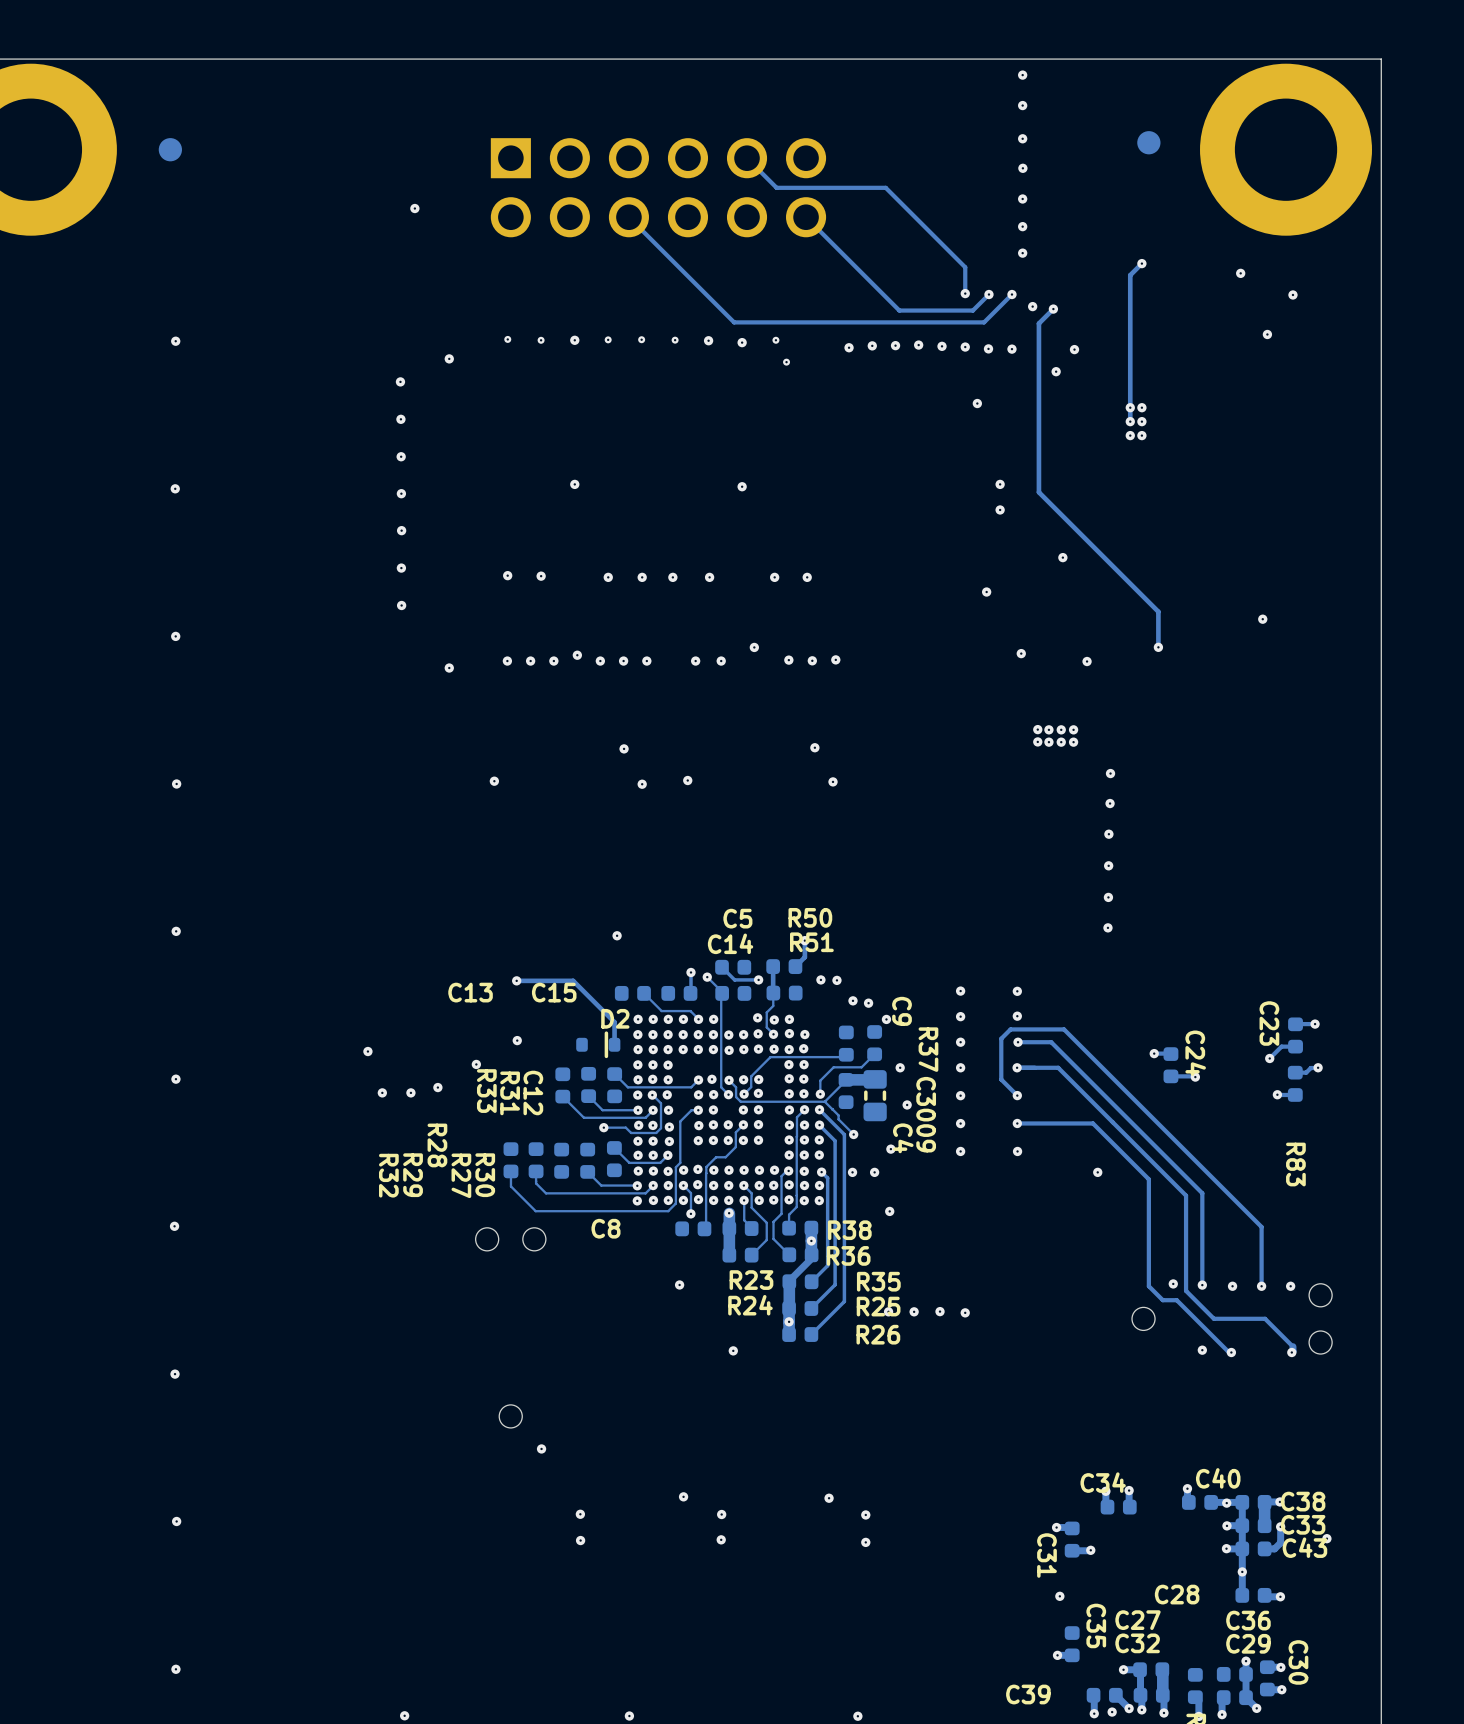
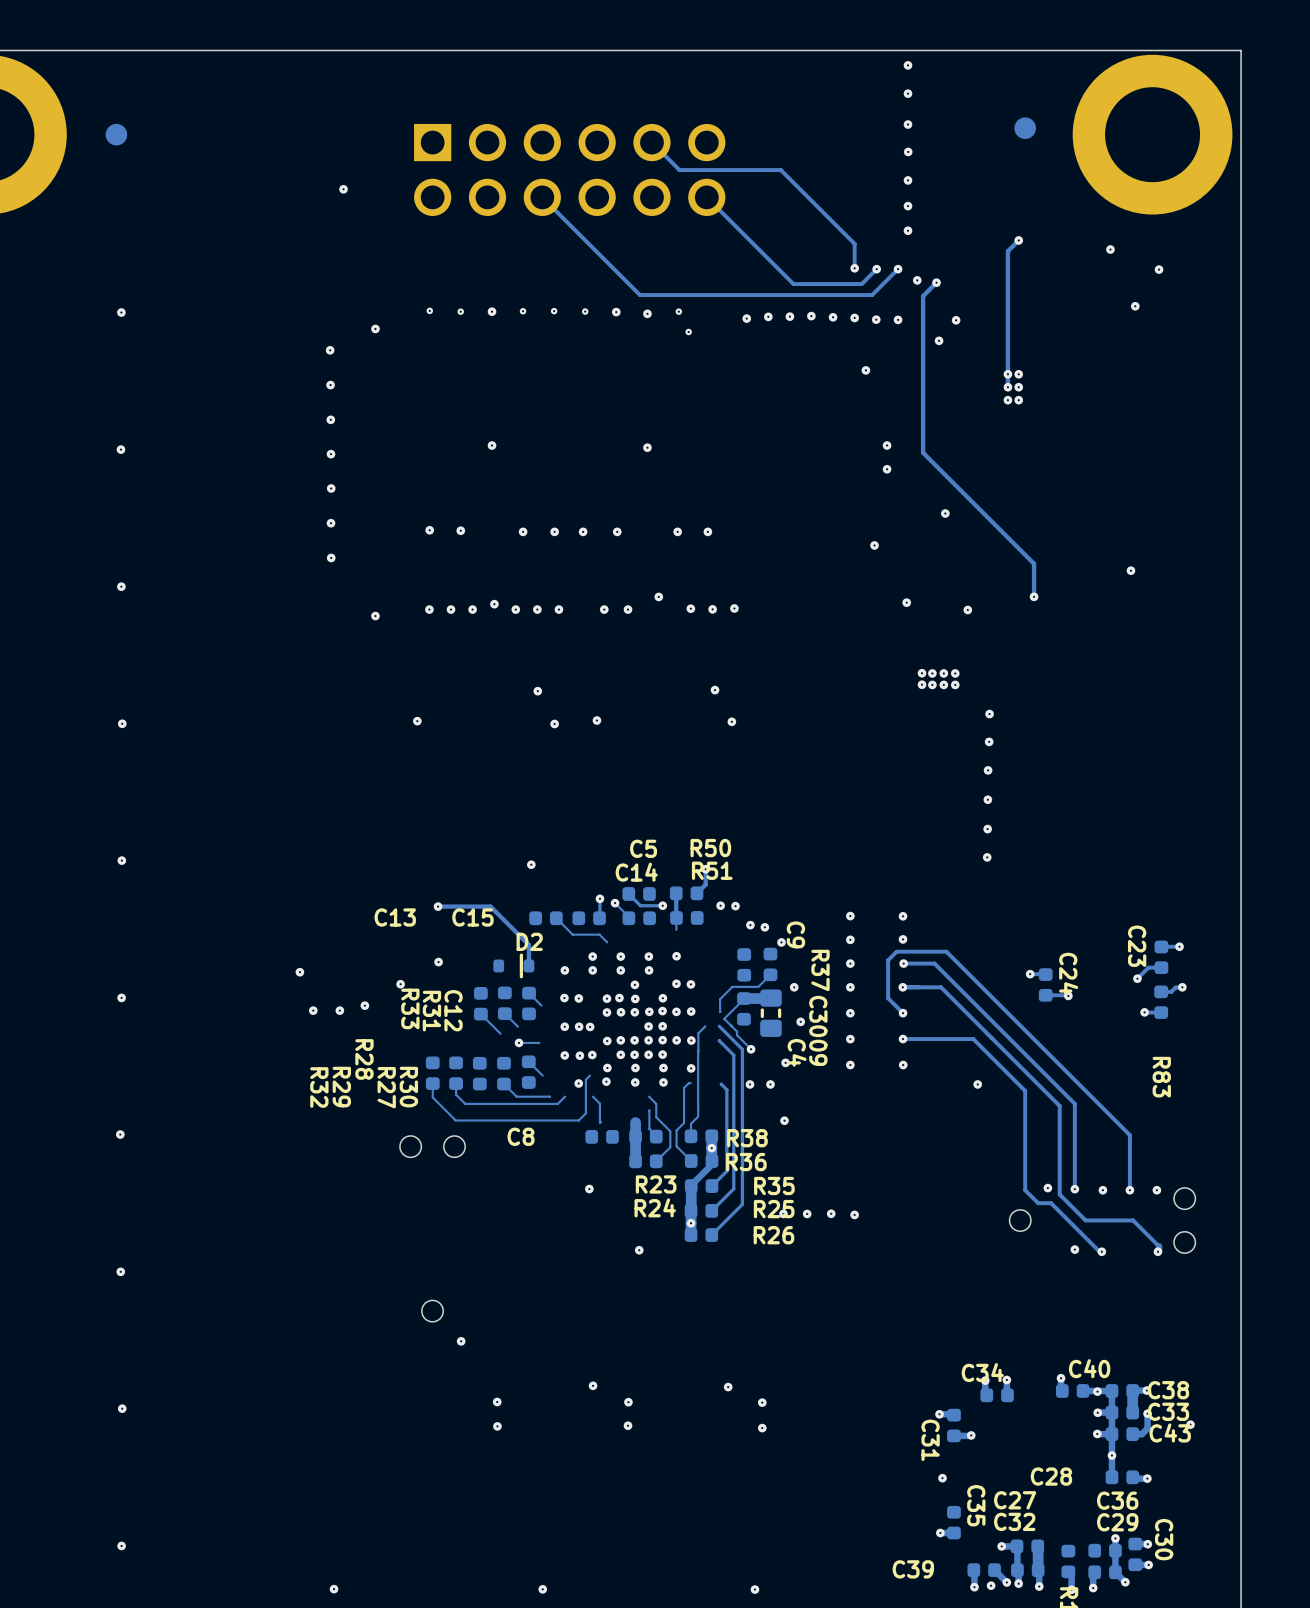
track: (721, 994) (721, 1087) (728, 1094) -> none
track: (773, 1005) (766, 1012) (766, 1027) (773, 1034) -> none
via: (757, 1017) -> none
via: (638, 1019) -> none
via: (653, 1019) -> none
via: (668, 1019) -> none
via: (683, 1019) -> none
via: (698, 1019) -> none
via: (713, 1019) -> none
via: (774, 1019) -> none
via: (789, 1019) -> none
via: (758, 1033) -> none
via: (789, 1033) -> none
via: (637, 1034) -> none
via: (652, 1034) -> none
via: (668, 1034) -> none
via: (698, 1034) -> none
via: (804, 1034) -> none
via: (728, 1035) -> none
via: (803, 1048) -> none
via: (638, 1049) -> none
via: (668, 1049) -> none
via: (698, 1049) -> none
via: (758, 1049) -> none
via: (774, 1049) -> none
via: (789, 1049) -> none
via: (729, 1050) -> none
track: (843, 1057) (770, 1057) (751, 1076) (751, 1087) (744, 1094) -> none
via: none -> (676, 983)
via: (637, 1064) -> none
via: (652, 1064) -> none
via: (804, 1064) -> none
via: (668, 1065) -> none
via: none -> (634, 984)
via: (789, 1078) -> none
via: (638, 1079) -> none
via: (743, 1079) -> none
via: (803, 1079) -> none
track: (698, 1080) (691, 1087) (627, 1087) -> none
track: (729, 1080) (736, 1087) (736, 1097) (740, 1101) (824, 1101) -> none
via: (803, 1093) -> none
via: (667, 1094) -> none
via: none -> (676, 1011)
via: (820, 1094) -> none
via: (637, 1095) -> none
track: (652, 1095) (661, 1103) (661, 1128) (656, 1132) (631, 1132) (625, 1127) -> none
via: (652, 1095) -> none
via: (713, 1109) -> none
via: (789, 1109) -> none
via: (804, 1109) -> none
via: (819, 1109) -> none
track: (638, 1110) (602, 1110) -> none
via: (638, 1110) -> none
track: (653, 1110) (645, 1117) (583, 1117) -> none
via: none -> (590, 1026)
track: (698, 1110) (691, 1110) (680, 1121) (680, 1162) -> none
via: (698, 1110) -> none
track: (743, 1124) (735, 1132) (735, 1147) (725, 1157) (716, 1157) (706, 1167) (706, 1173) -> none
via: none -> (676, 1040)
via: (638, 1125) -> none
via: (652, 1125) -> none
via: (804, 1125) -> none
via: (819, 1125) -> none
via: (669, 1127) -> none
via: (789, 1139) -> none
via: (804, 1139) -> none
via: (819, 1139) -> none
via: none -> (592, 1055)
via: (698, 1140) -> none
via: (637, 1141) -> none
via: none -> (607, 1067)
via: none -> (635, 1067)
via: none -> (663, 1067)
via: (638, 1155) -> none
via: (653, 1155) -> none
track: (667, 1155) (660, 1162) (629, 1162) -> none
via: (667, 1155) -> none
via: (804, 1155) -> none
via: (819, 1155) -> none
via: (683, 1170) -> none
via: (713, 1170) -> none
via: (744, 1170) -> none
via: (774, 1170) -> none
via: (788, 1170) -> none
via: (638, 1171) -> none
via: (653, 1171) -> none
via: (804, 1171) -> none
via: (821, 1172) -> none
track: (706, 1173) (706, 1227) (704, 1228) -> none
via: (697, 1184) -> none
via: (789, 1184) -> none
via: (637, 1185) -> none
via: (653, 1185) -> none
via: (668, 1185) -> none
via: (683, 1185) -> none
via: (713, 1185) -> none
via: (728, 1185) -> none
via: (743, 1185) -> none
via: (759, 1185) -> none
via: (773, 1185) -> none
via: (804, 1185) -> none
via: (819, 1185) -> none
via: (698, 1199) -> none
via: (789, 1199) -> none
via: (637, 1200) -> none
via: (653, 1200) -> none
via: (668, 1200) -> none
via: (683, 1200) -> none
via: (713, 1200) -> none
via: (728, 1200) -> none
via: (744, 1200) -> none
via: (759, 1200) -> none
via: (773, 1200) -> none
via: (804, 1200) -> none
via: (819, 1200) -> none
via: (690, 1213) -> none
via: (729, 1213) -> none

